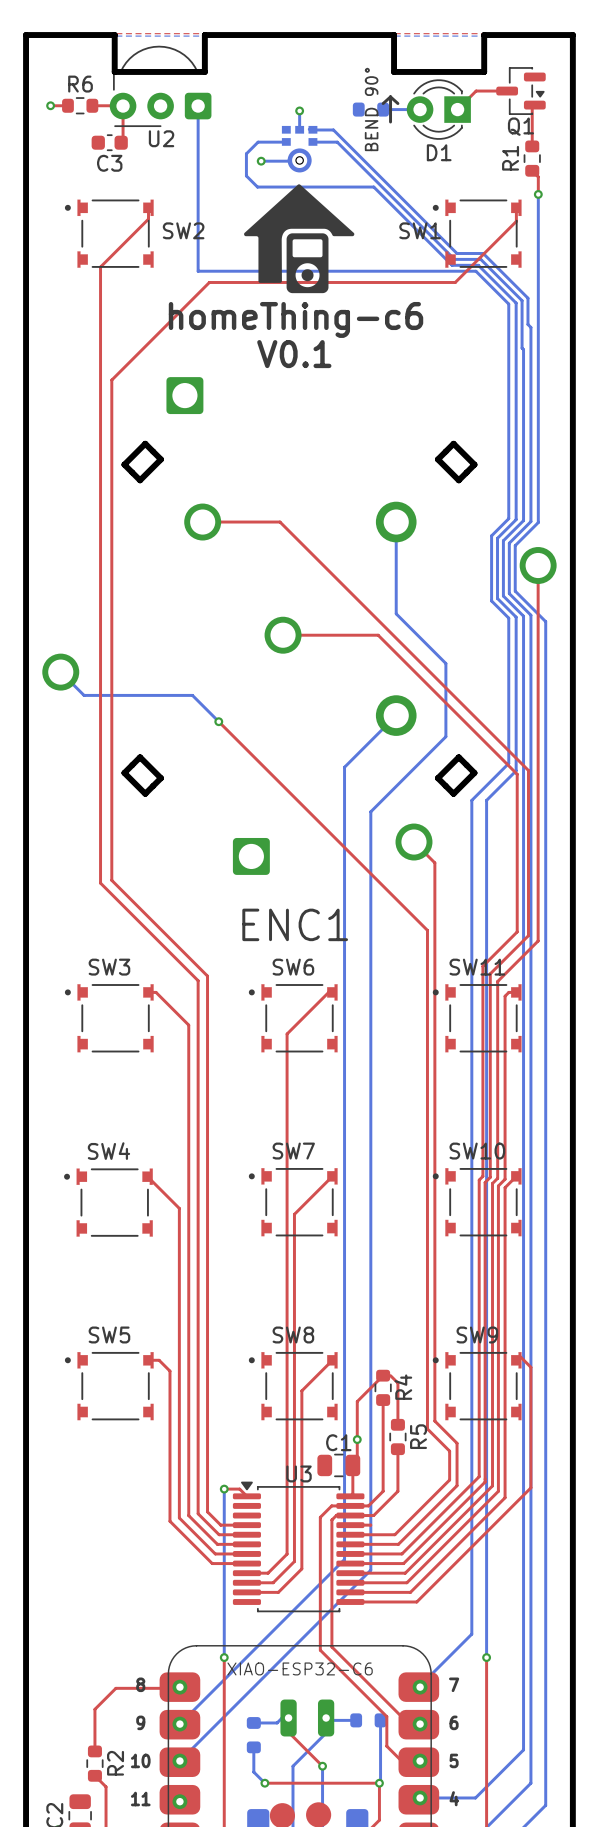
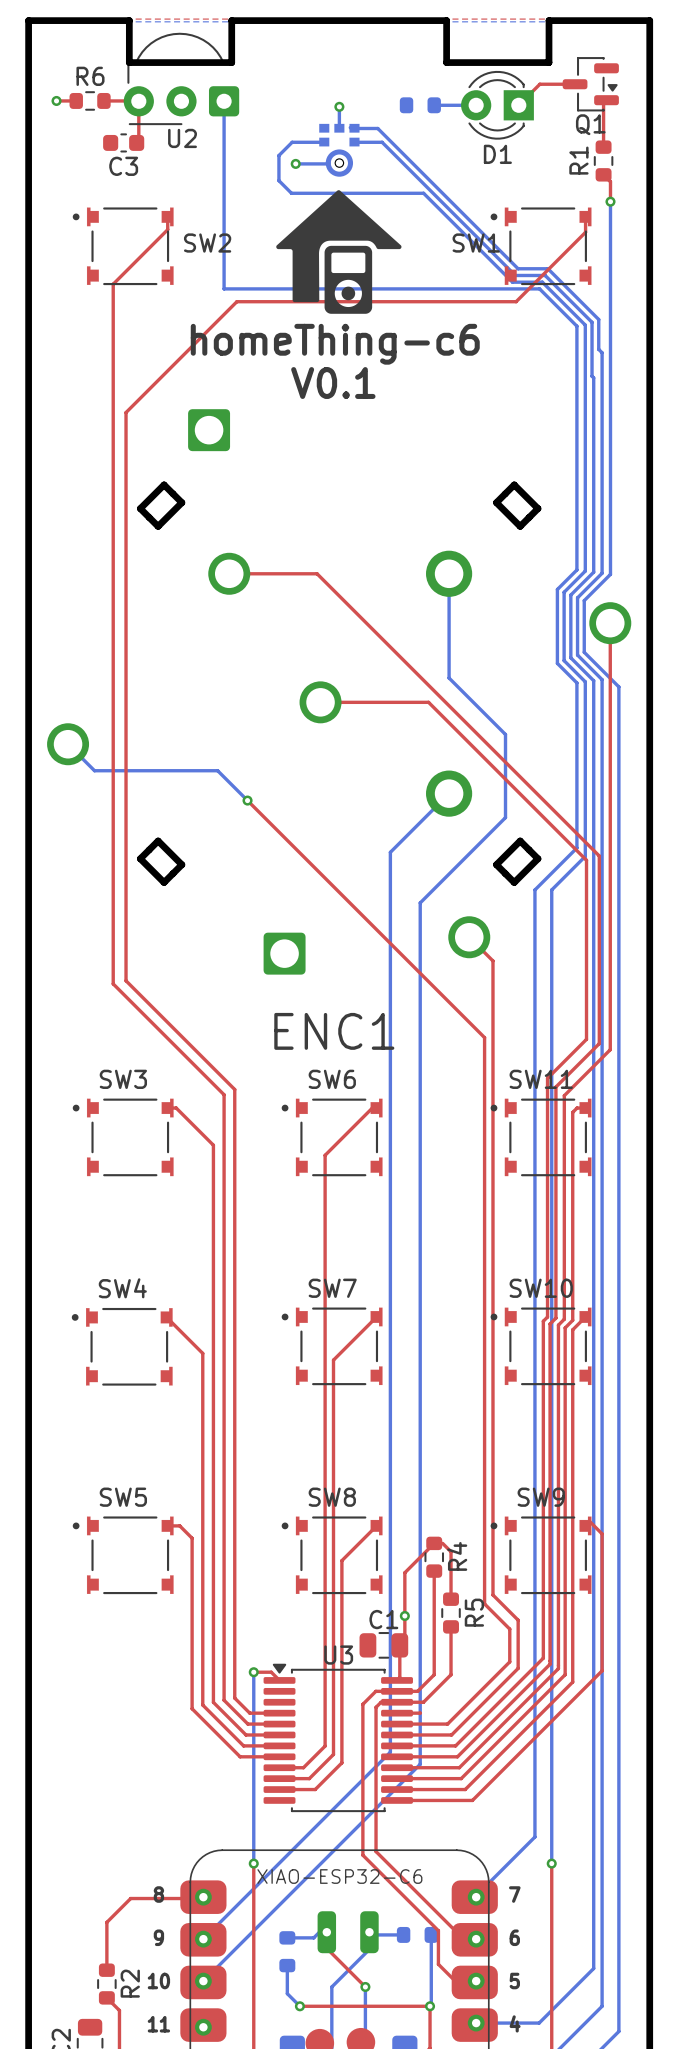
line: (390, 96) (383, 103) -> none
line: (390, 96) (397, 103) -> none
line: (390, 96) (390, 122) -> none
text: BEND 90° (371, 109) -> none

